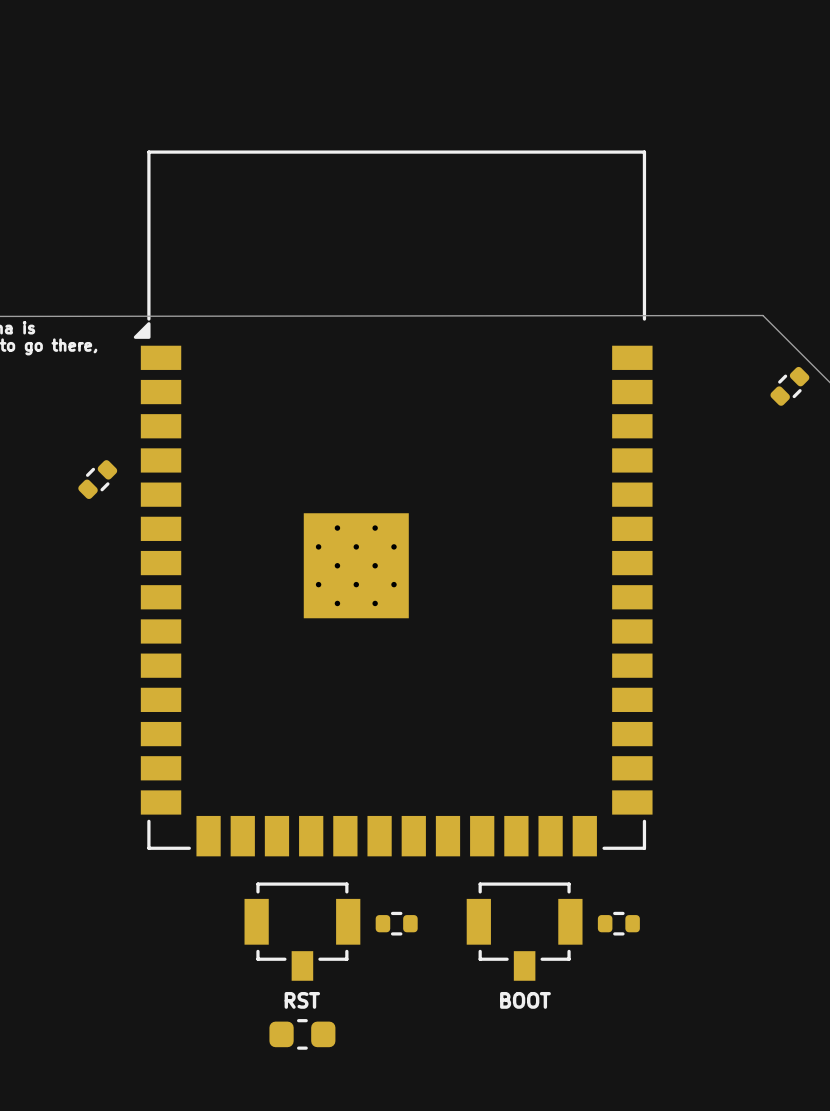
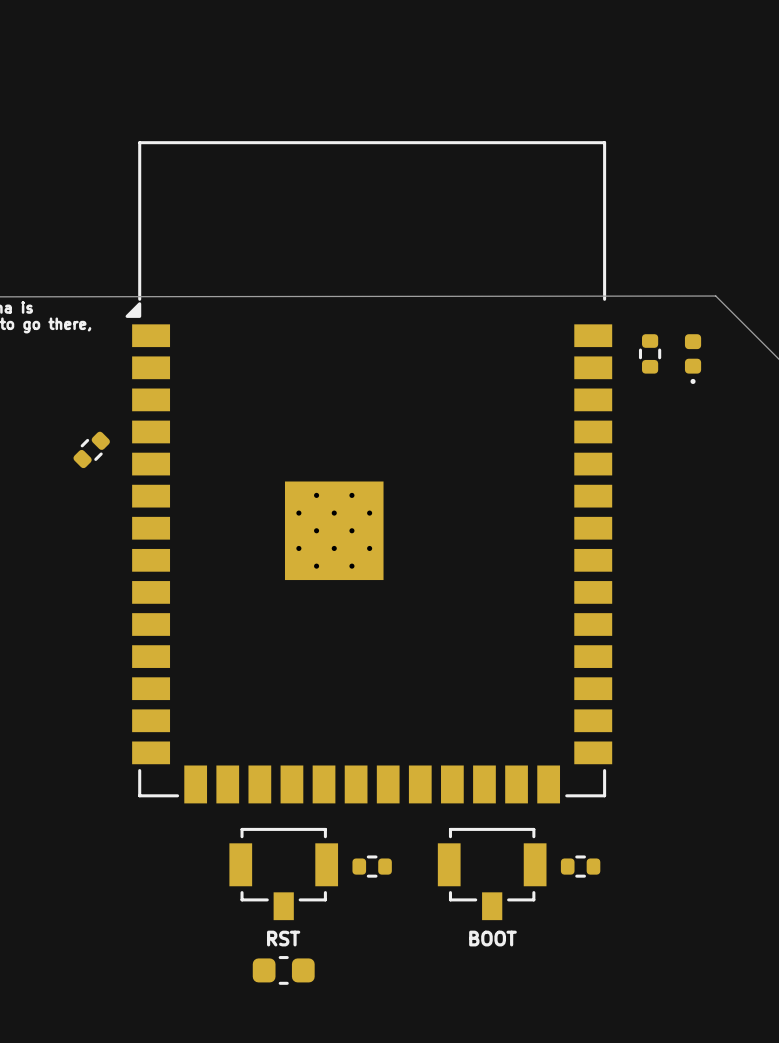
part: none -> (650, 353)
part: none -> (693, 359)
part: (789, 386) -> none

